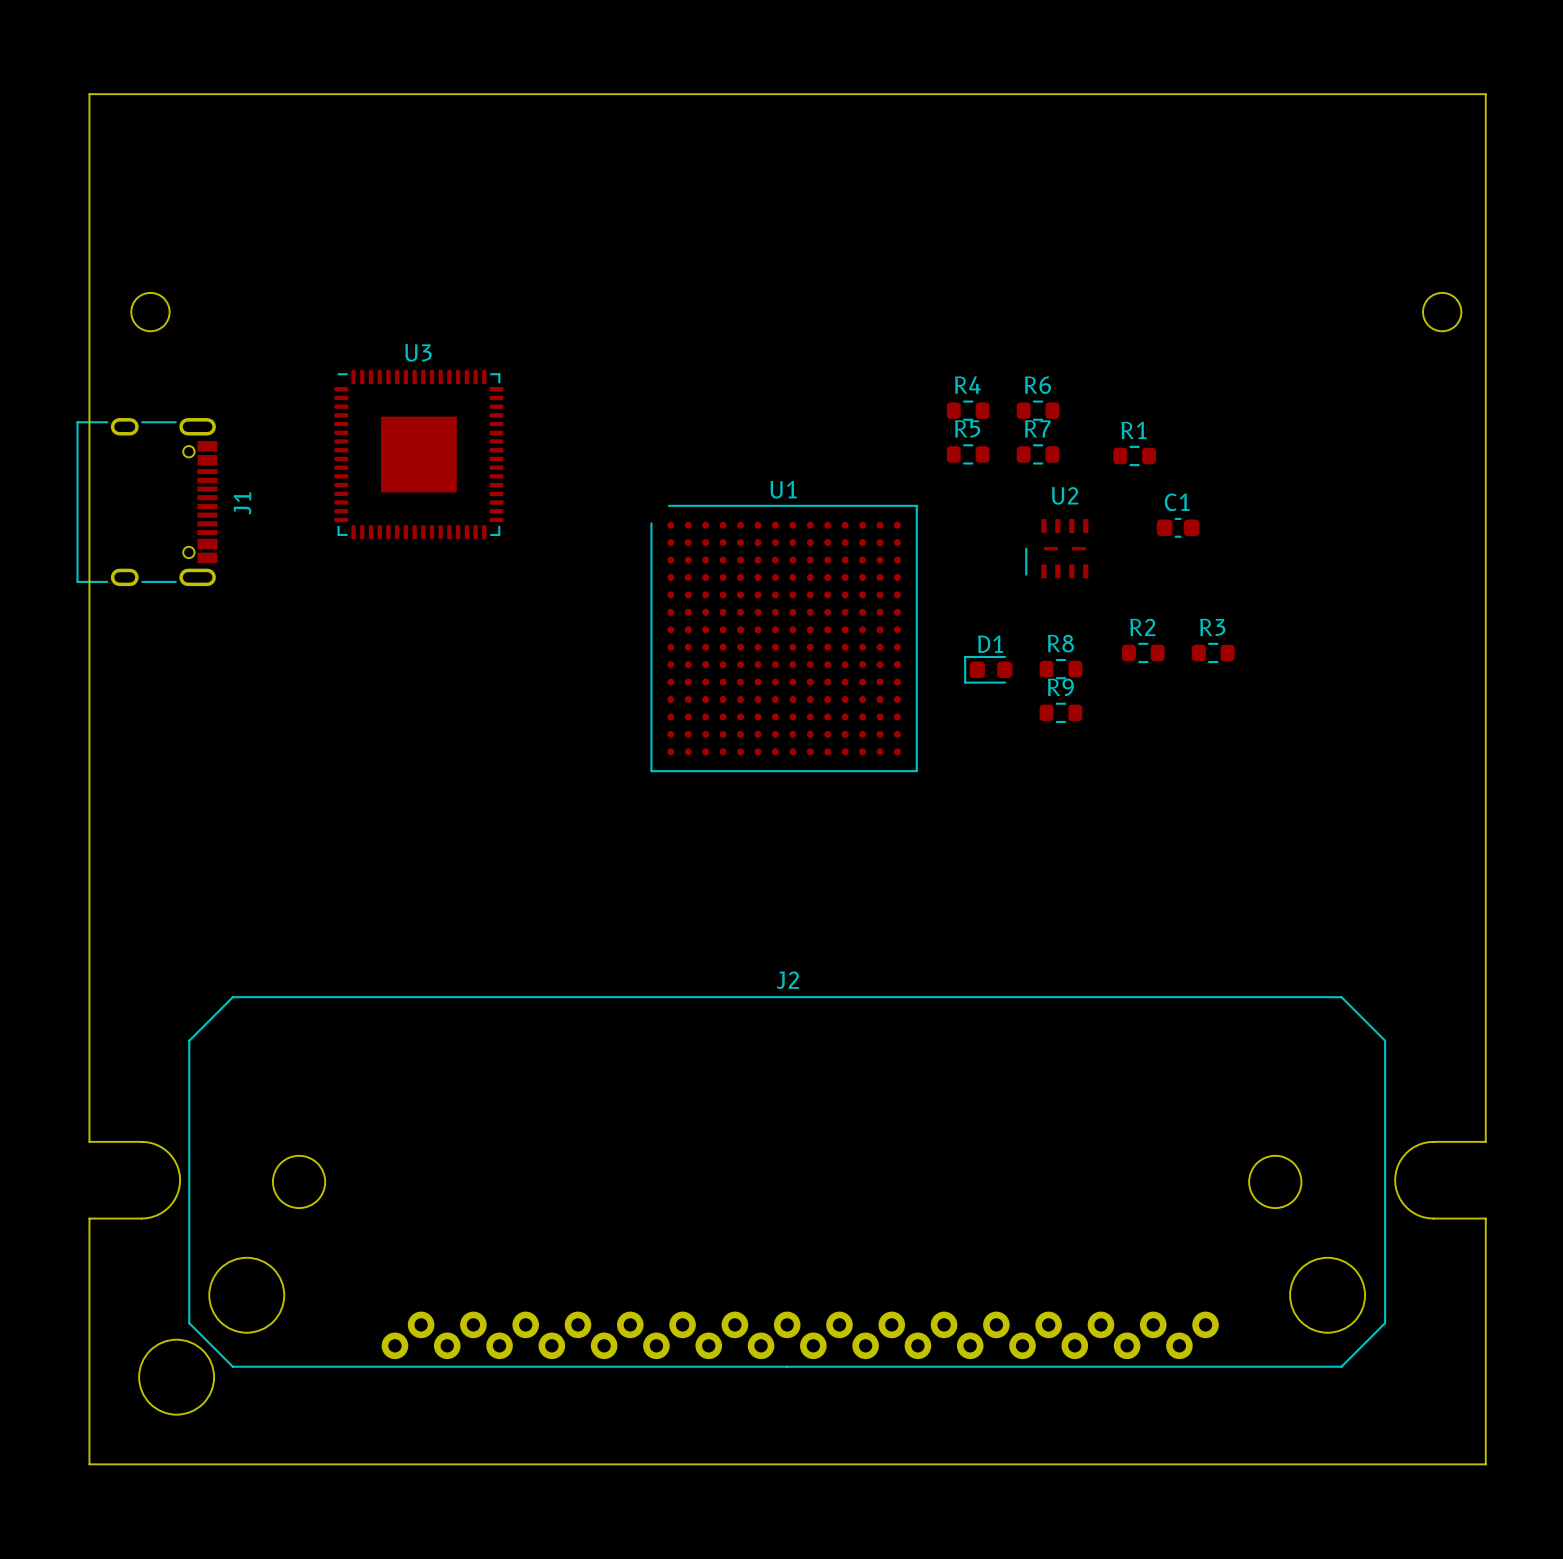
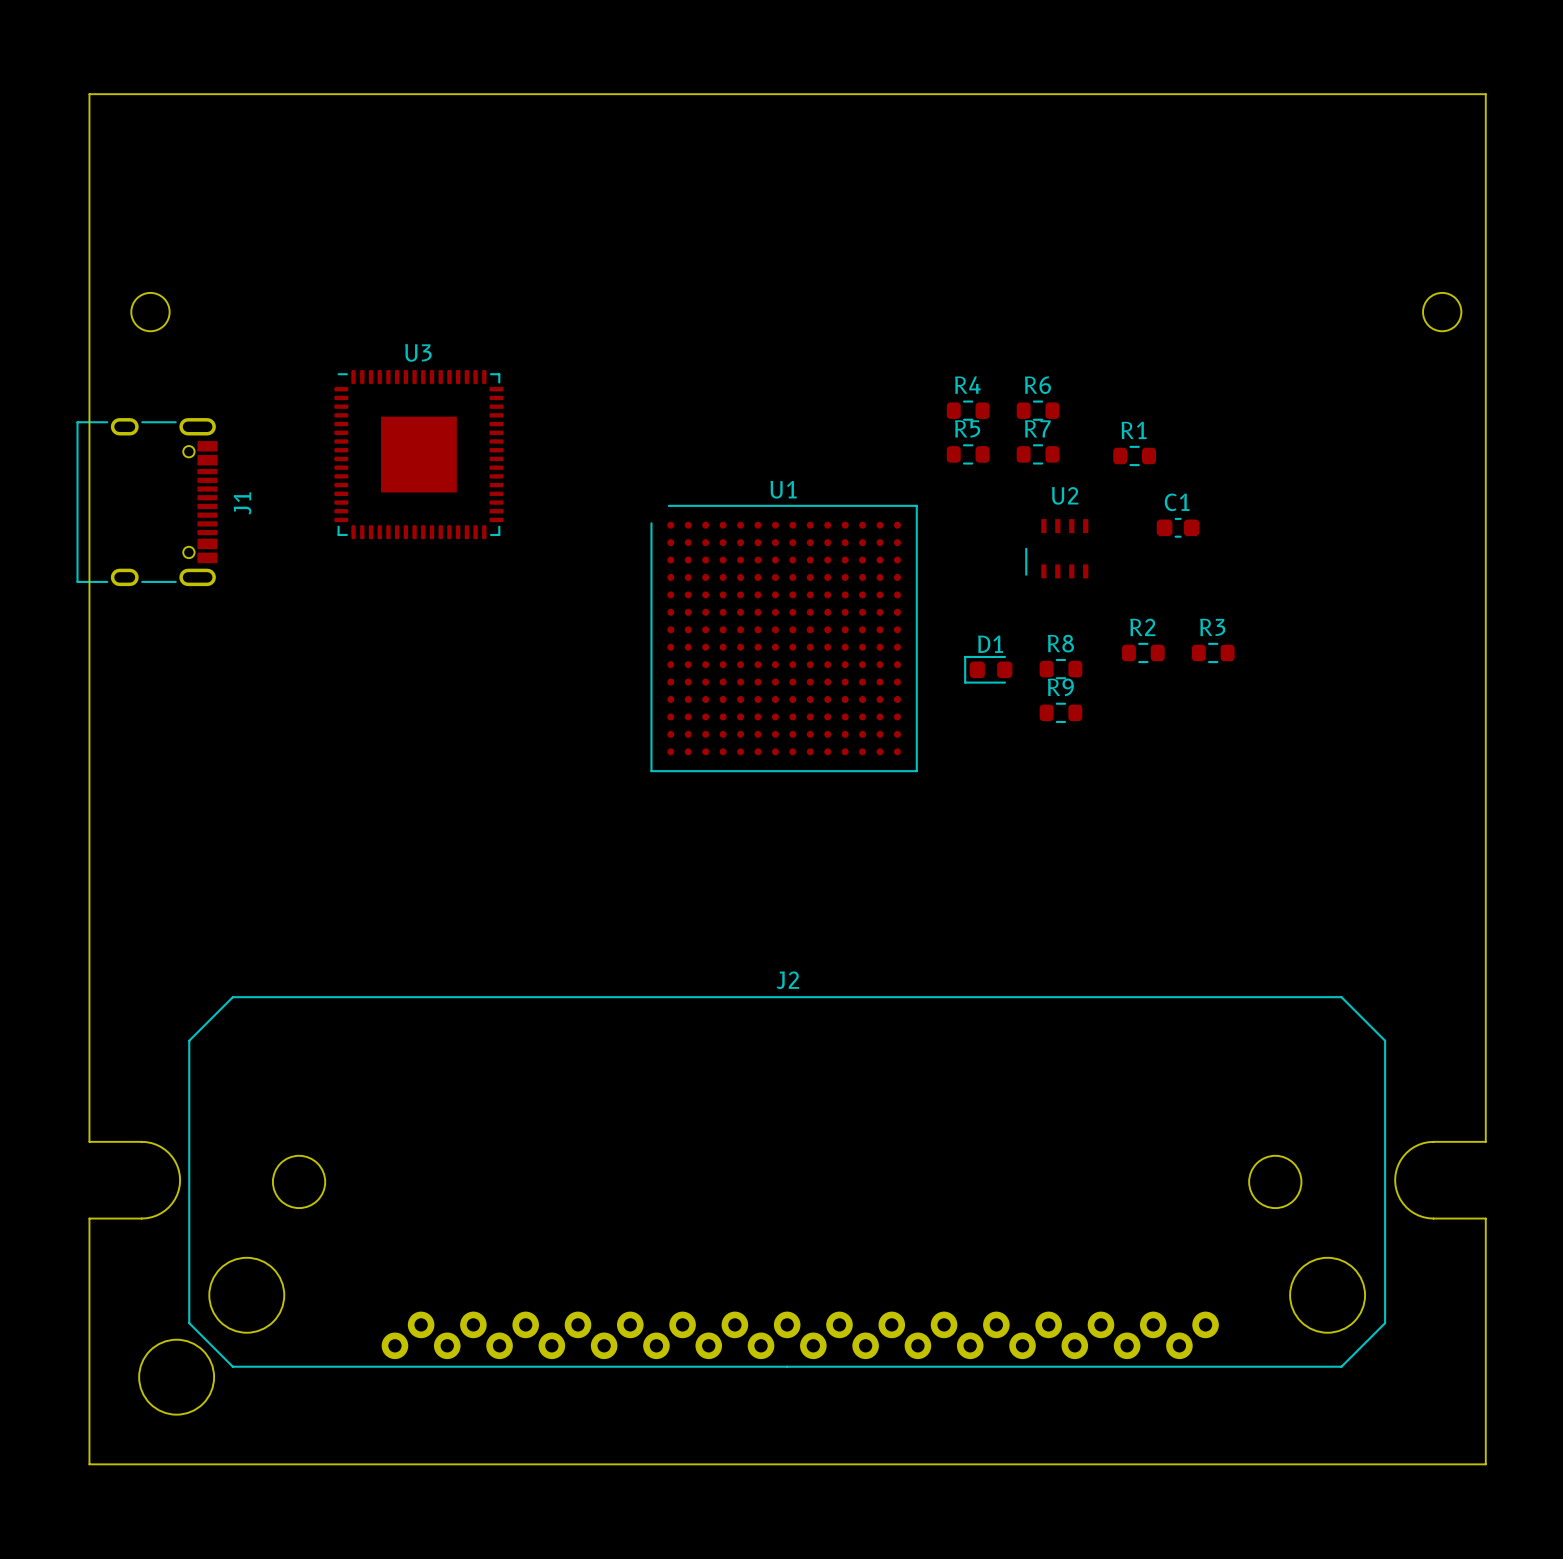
U2 footprint: [1025, 519, 1089, 579] -> [1025, 519, 1089, 579]

